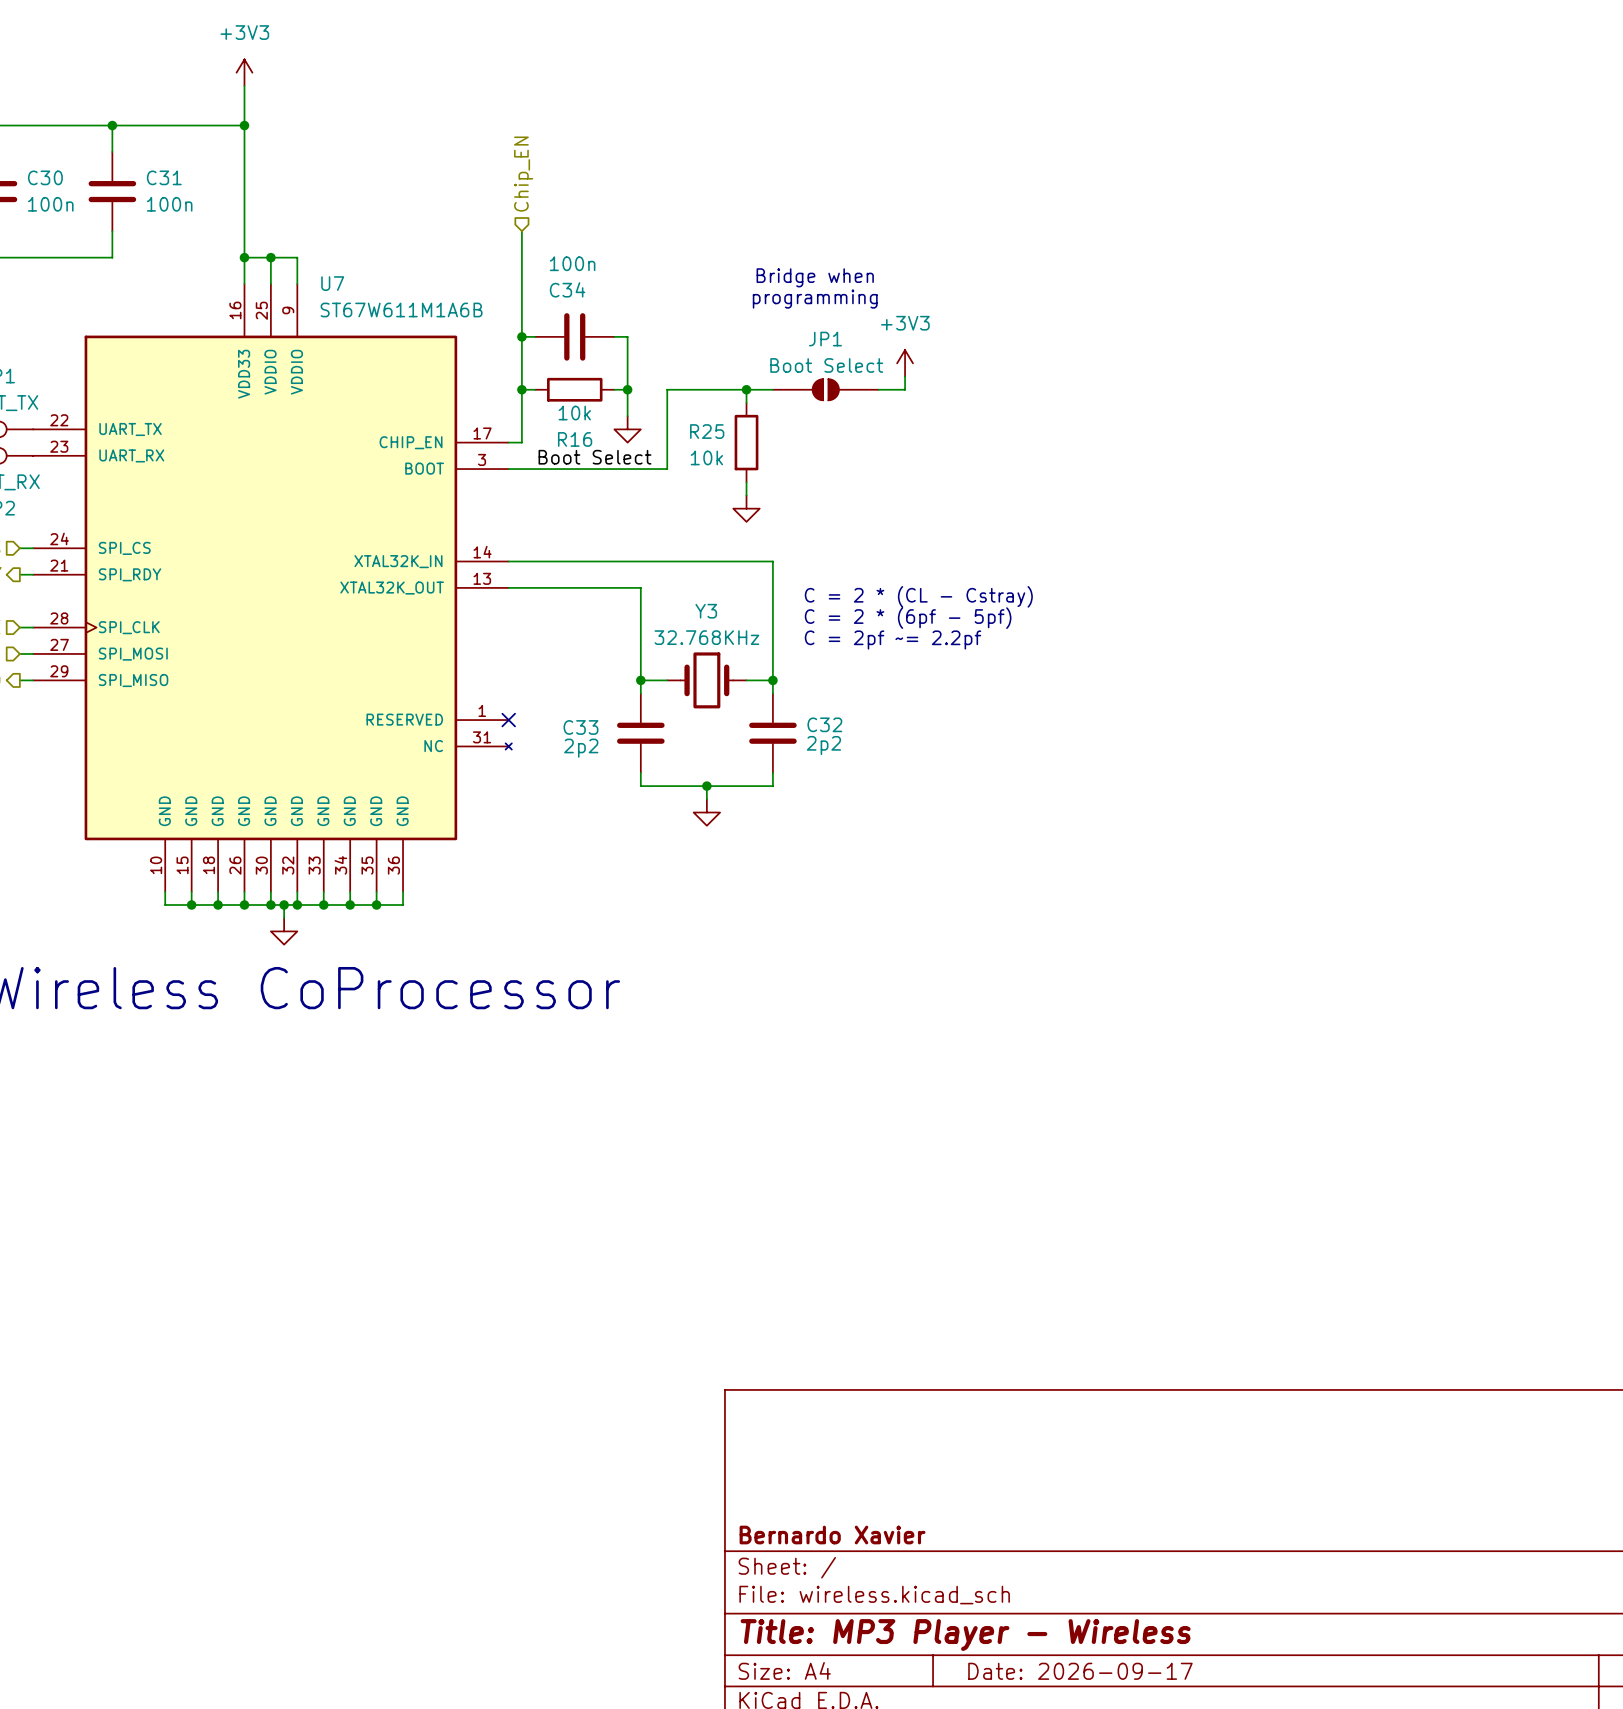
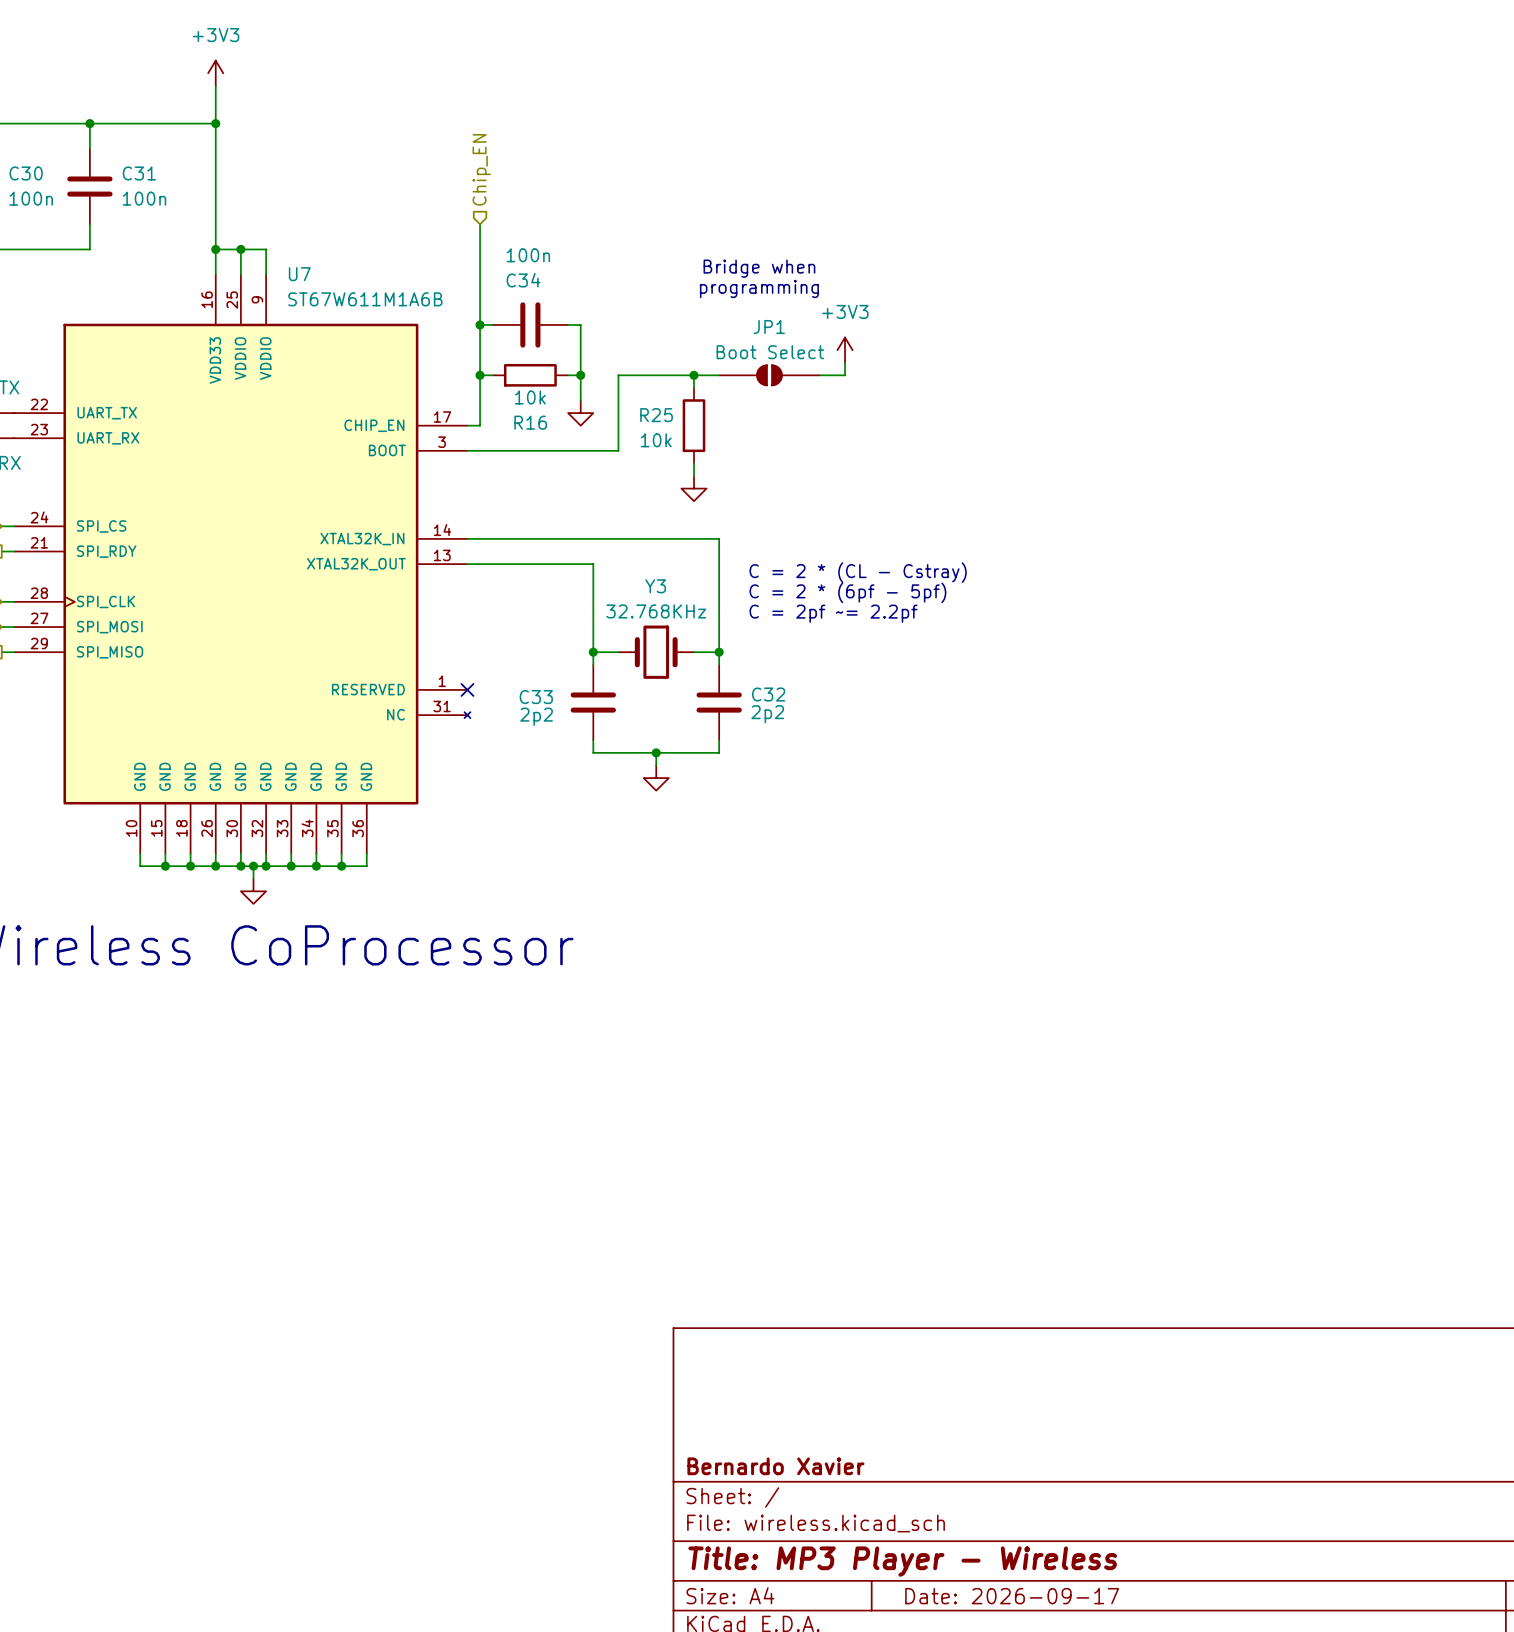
label: Boot Select (595, 457) -> none

